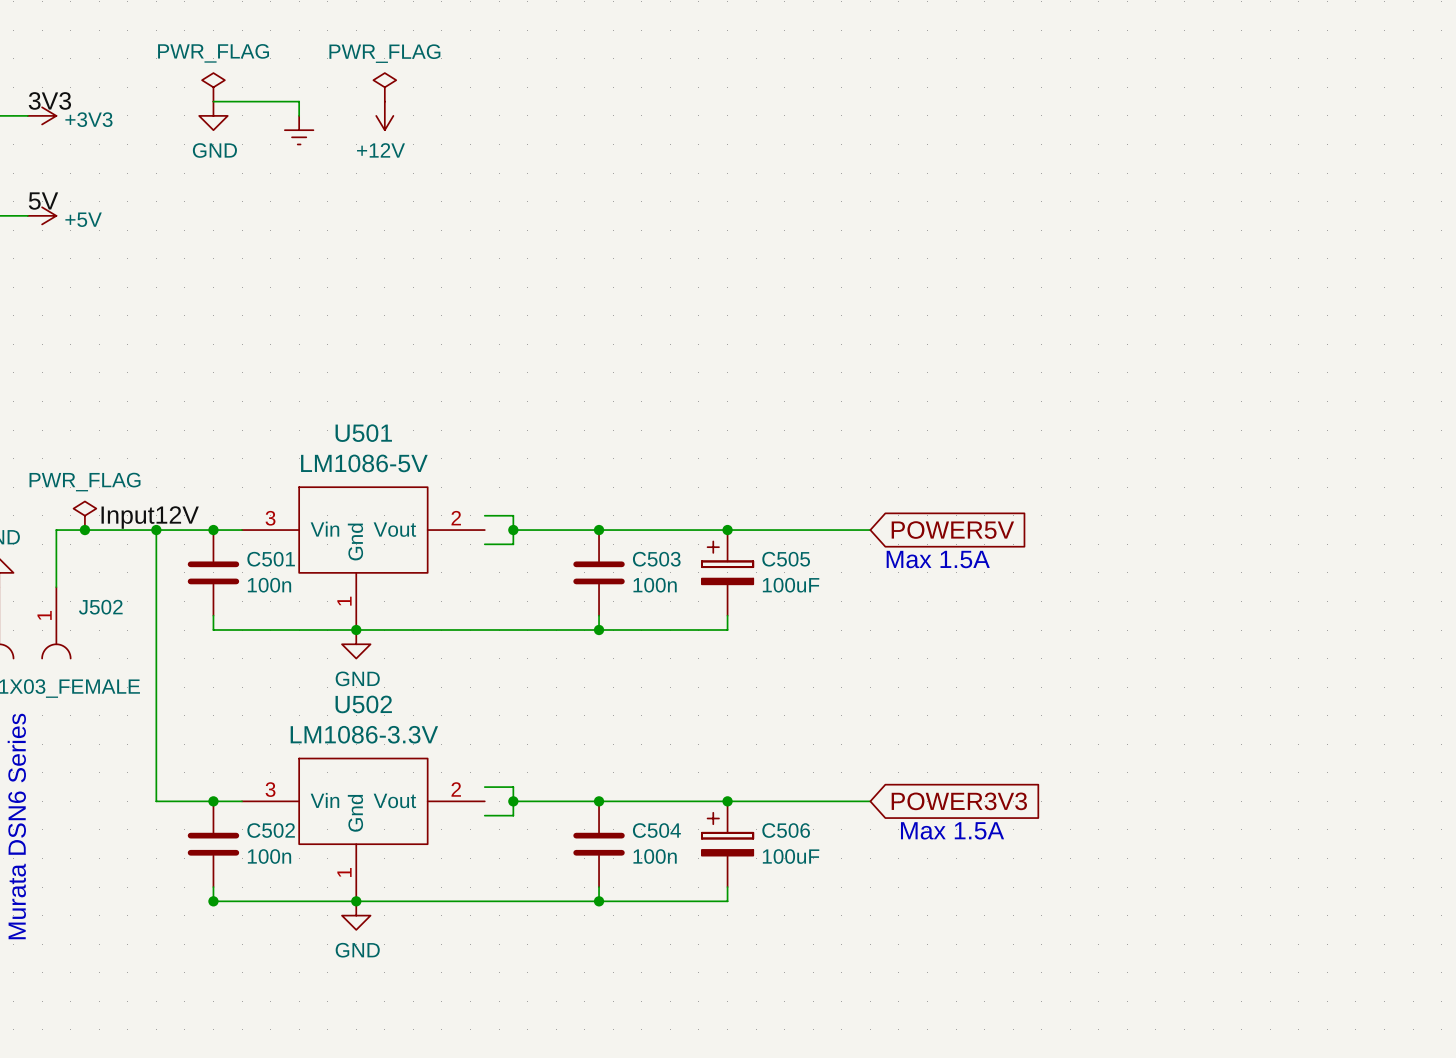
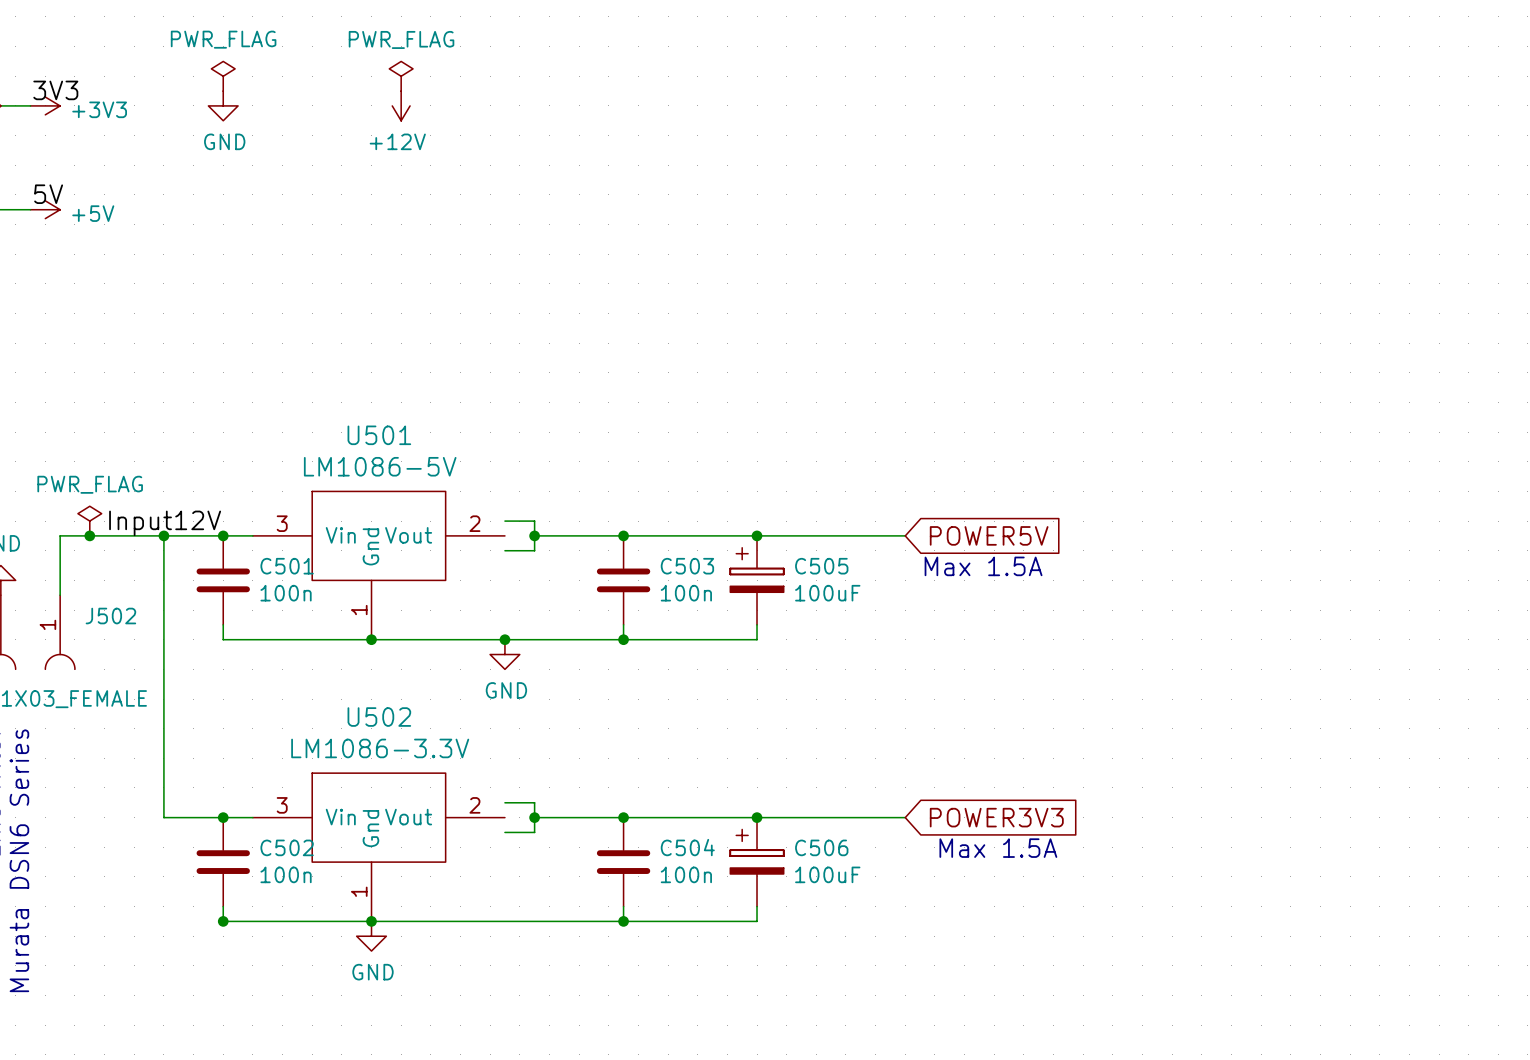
wire: (213, 101) (299, 101) (299, 115) -> none
power symbol: (299, 130) -> none
junction: none -> (504, 639)
power symbol position: GND (356, 644) -> GND (504, 654)

